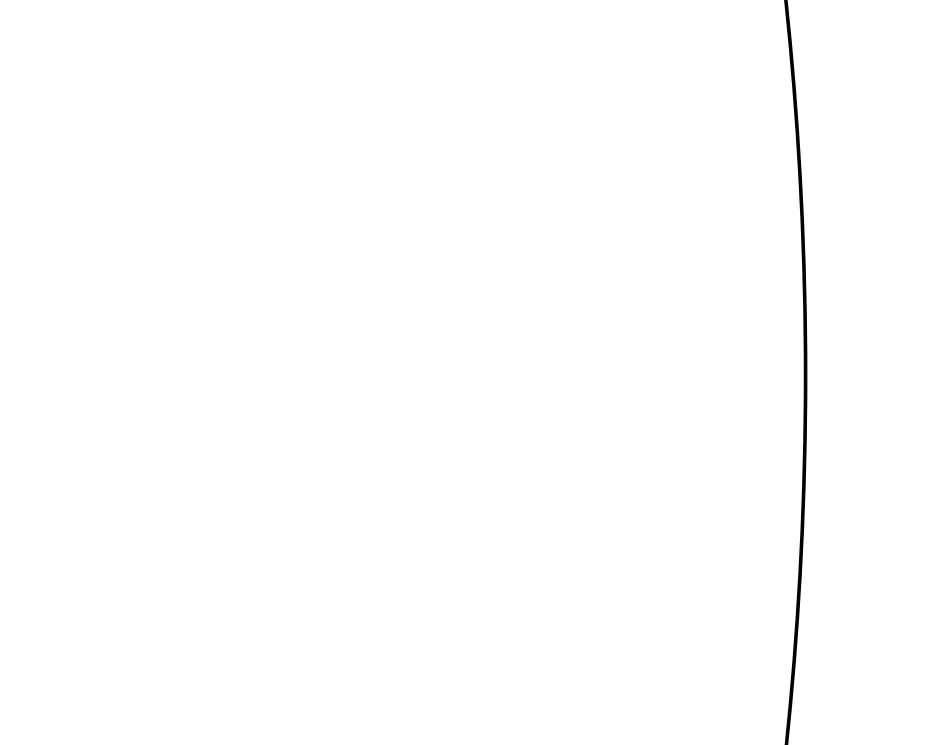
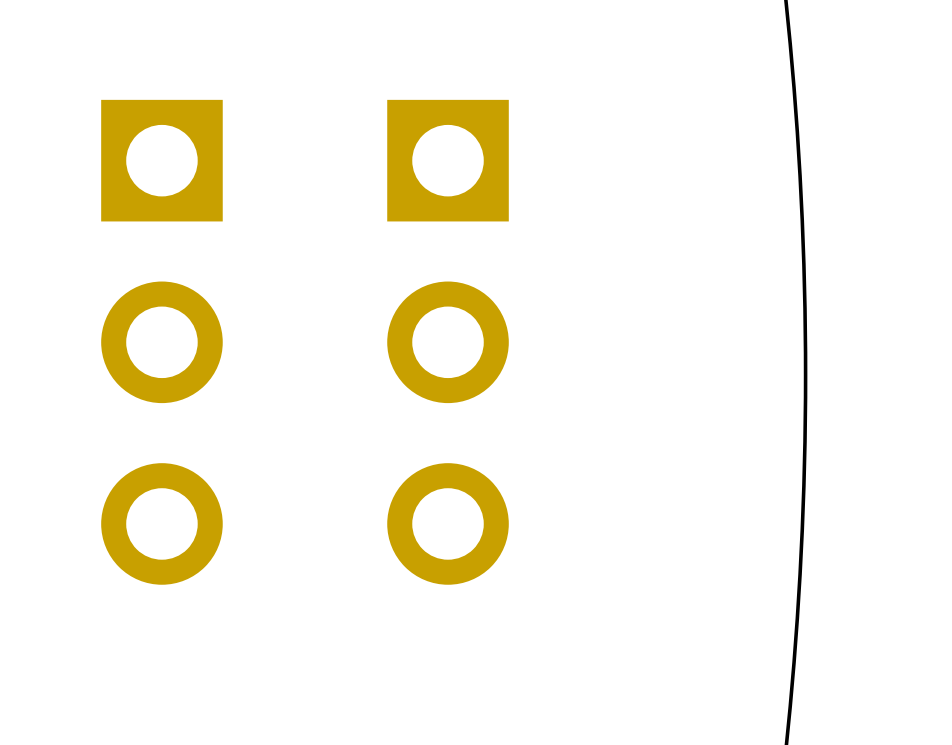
part: none -> (161, 342)
part: none -> (448, 342)

